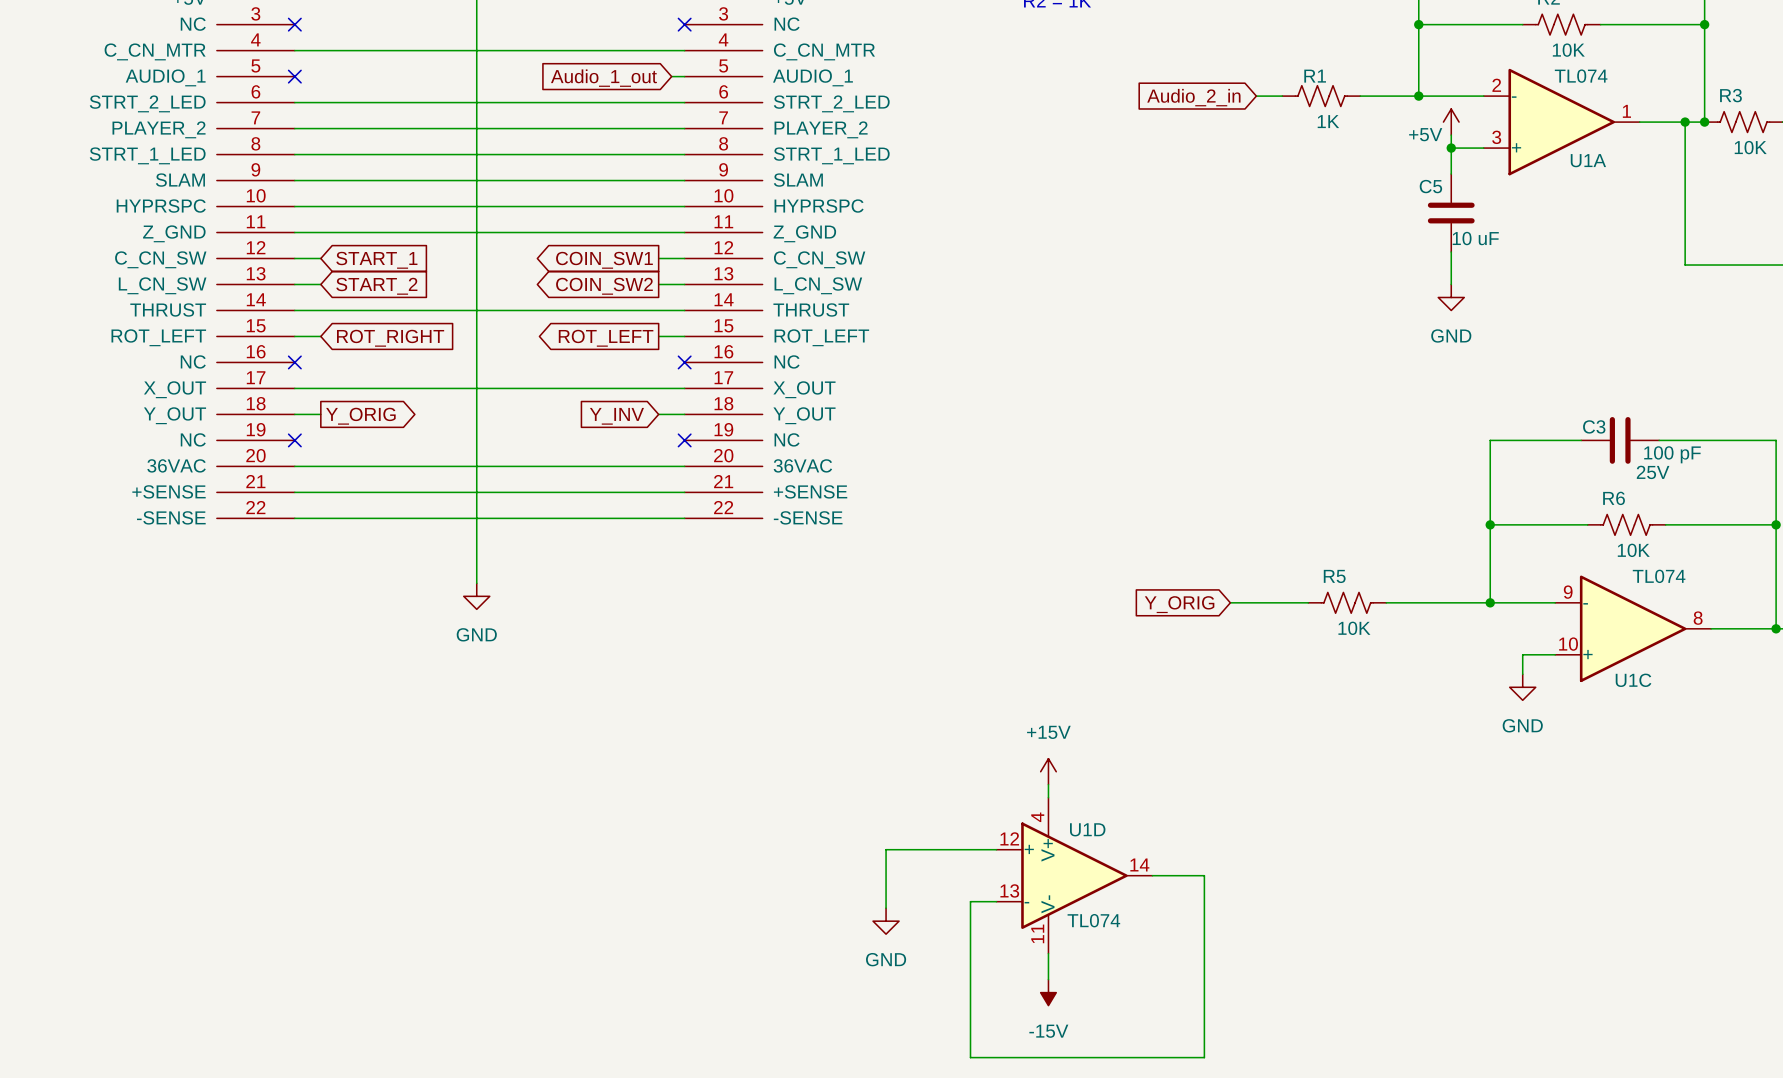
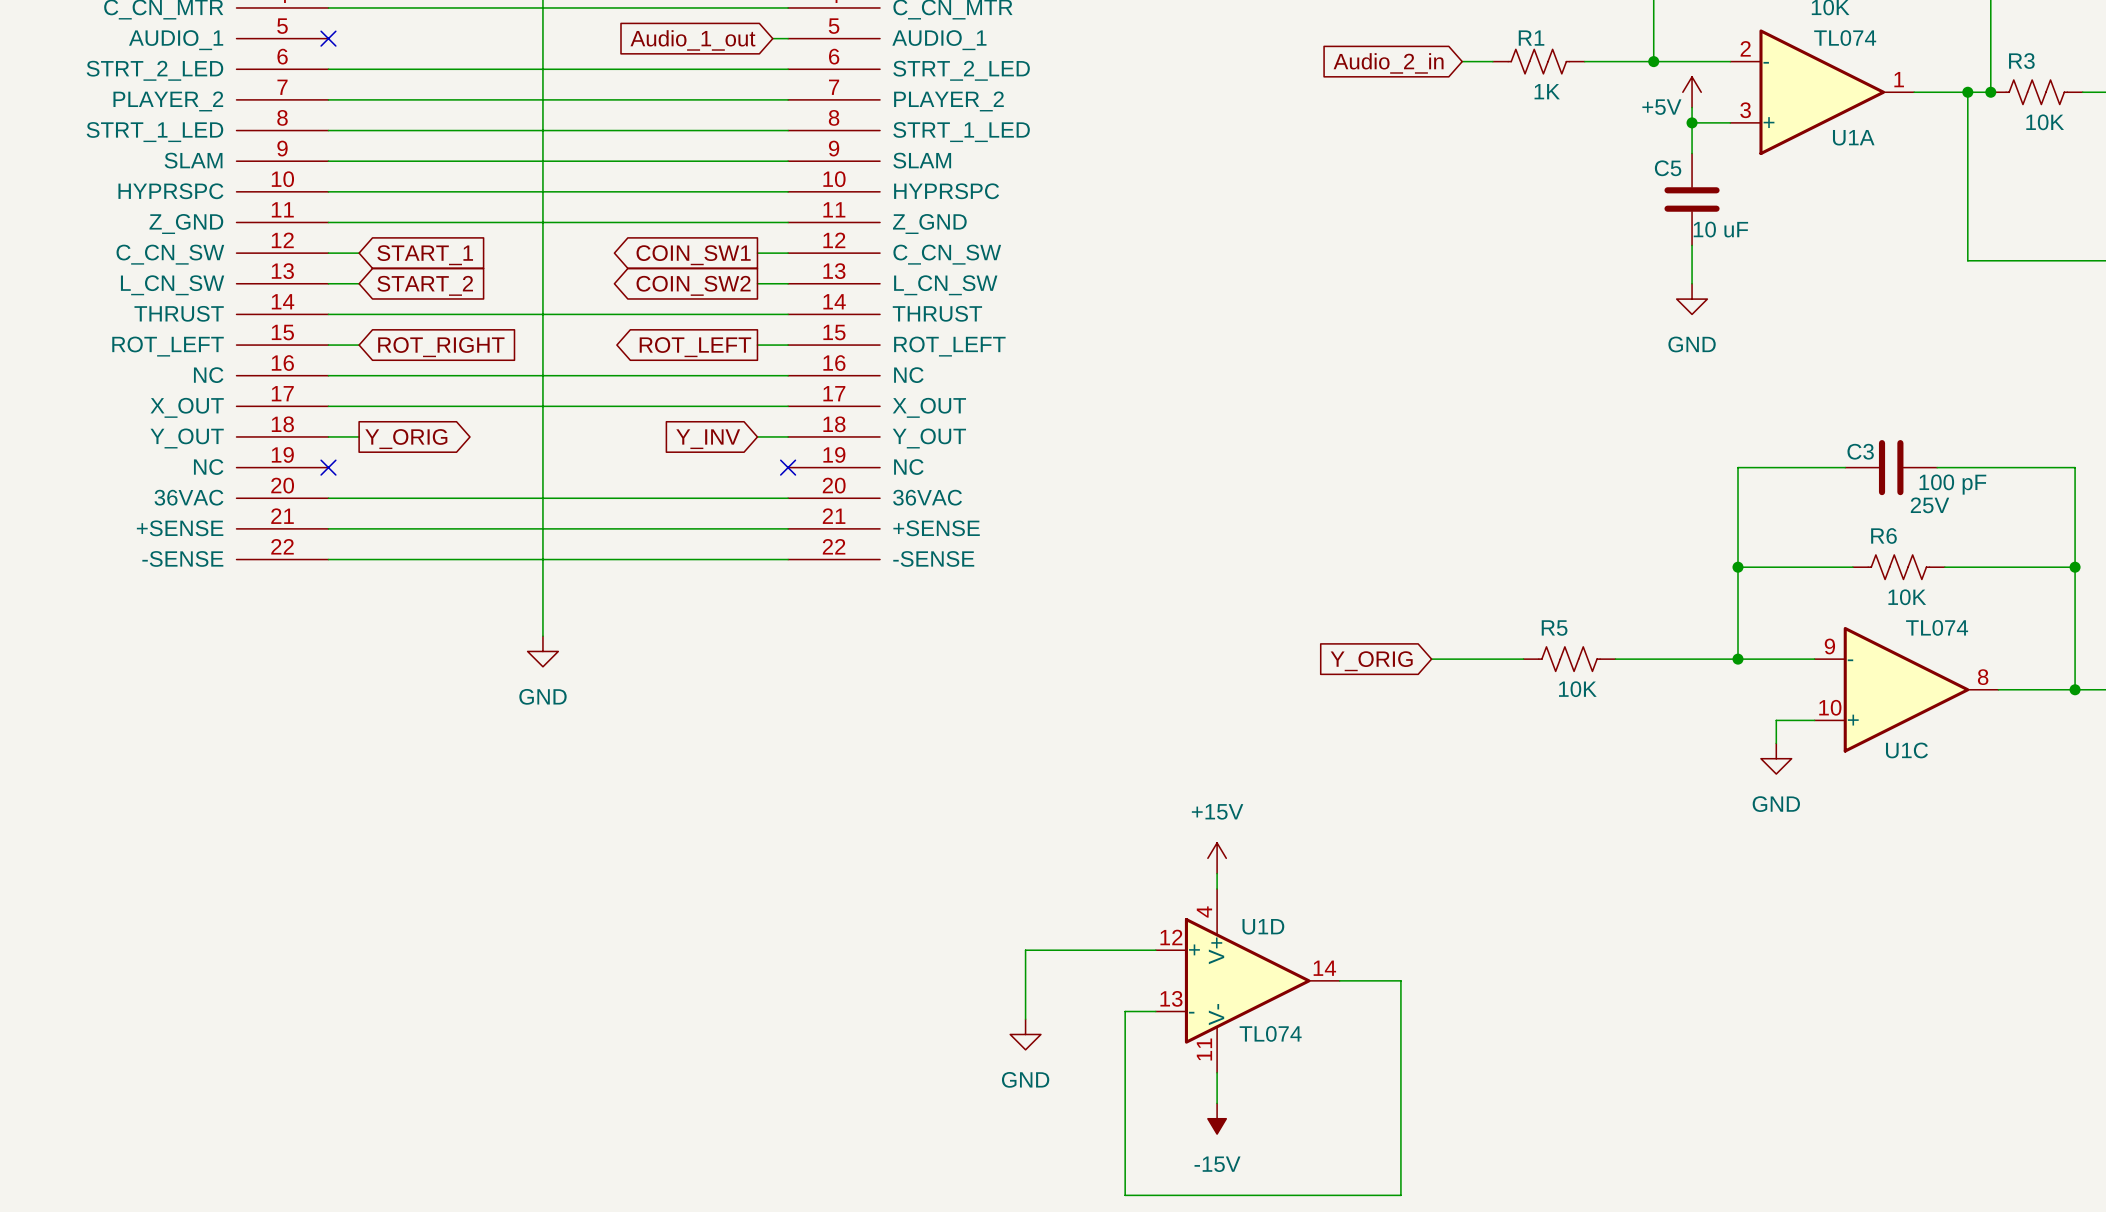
wire: none -> (328, 375) (788, 375)
no-connect mark: (294, 362) -> none
no-connect mark: (684, 362) -> none

